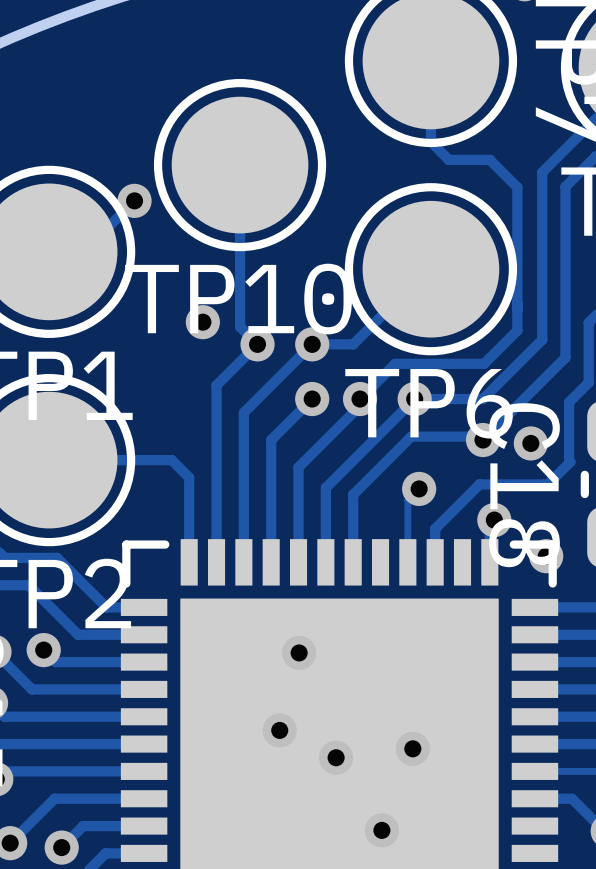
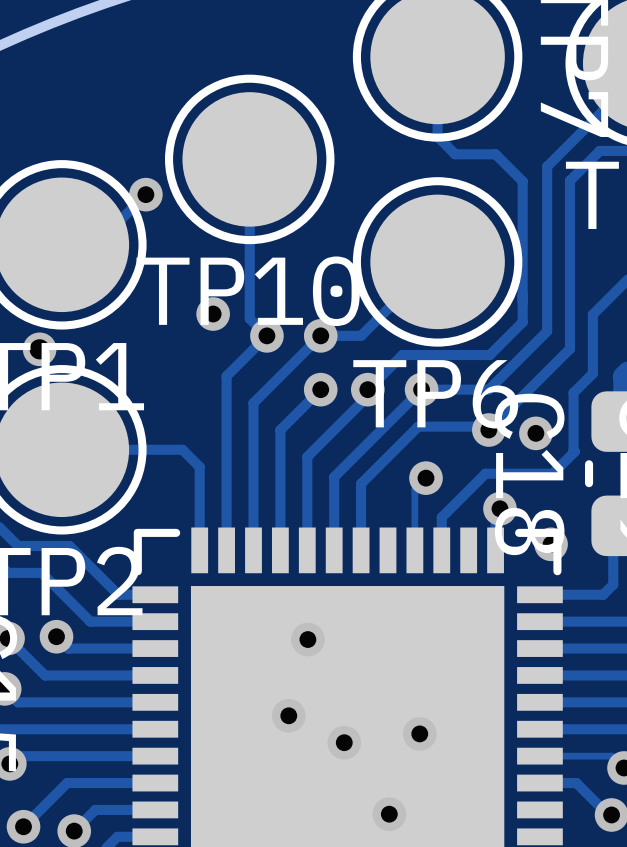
via: none -> (39, 349)

